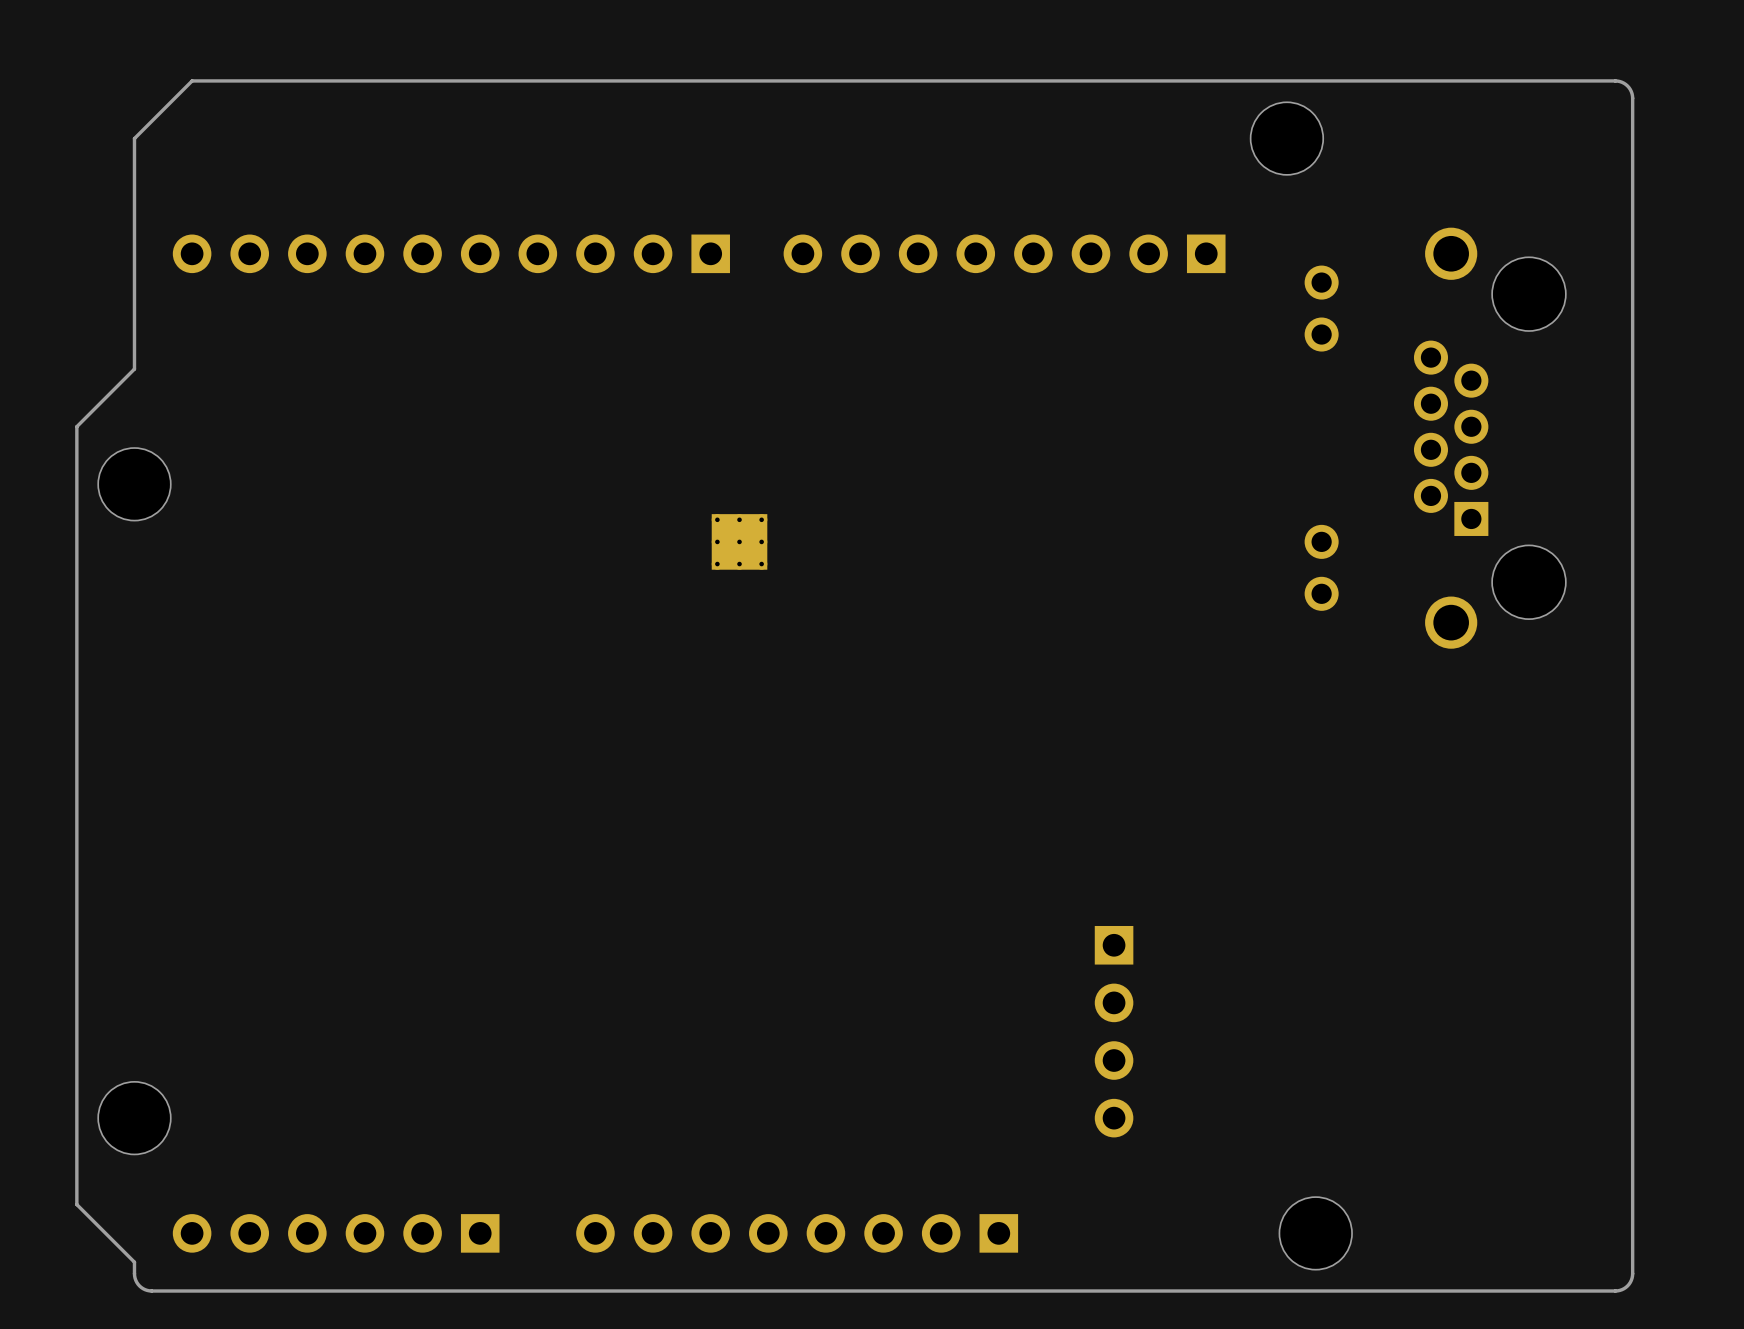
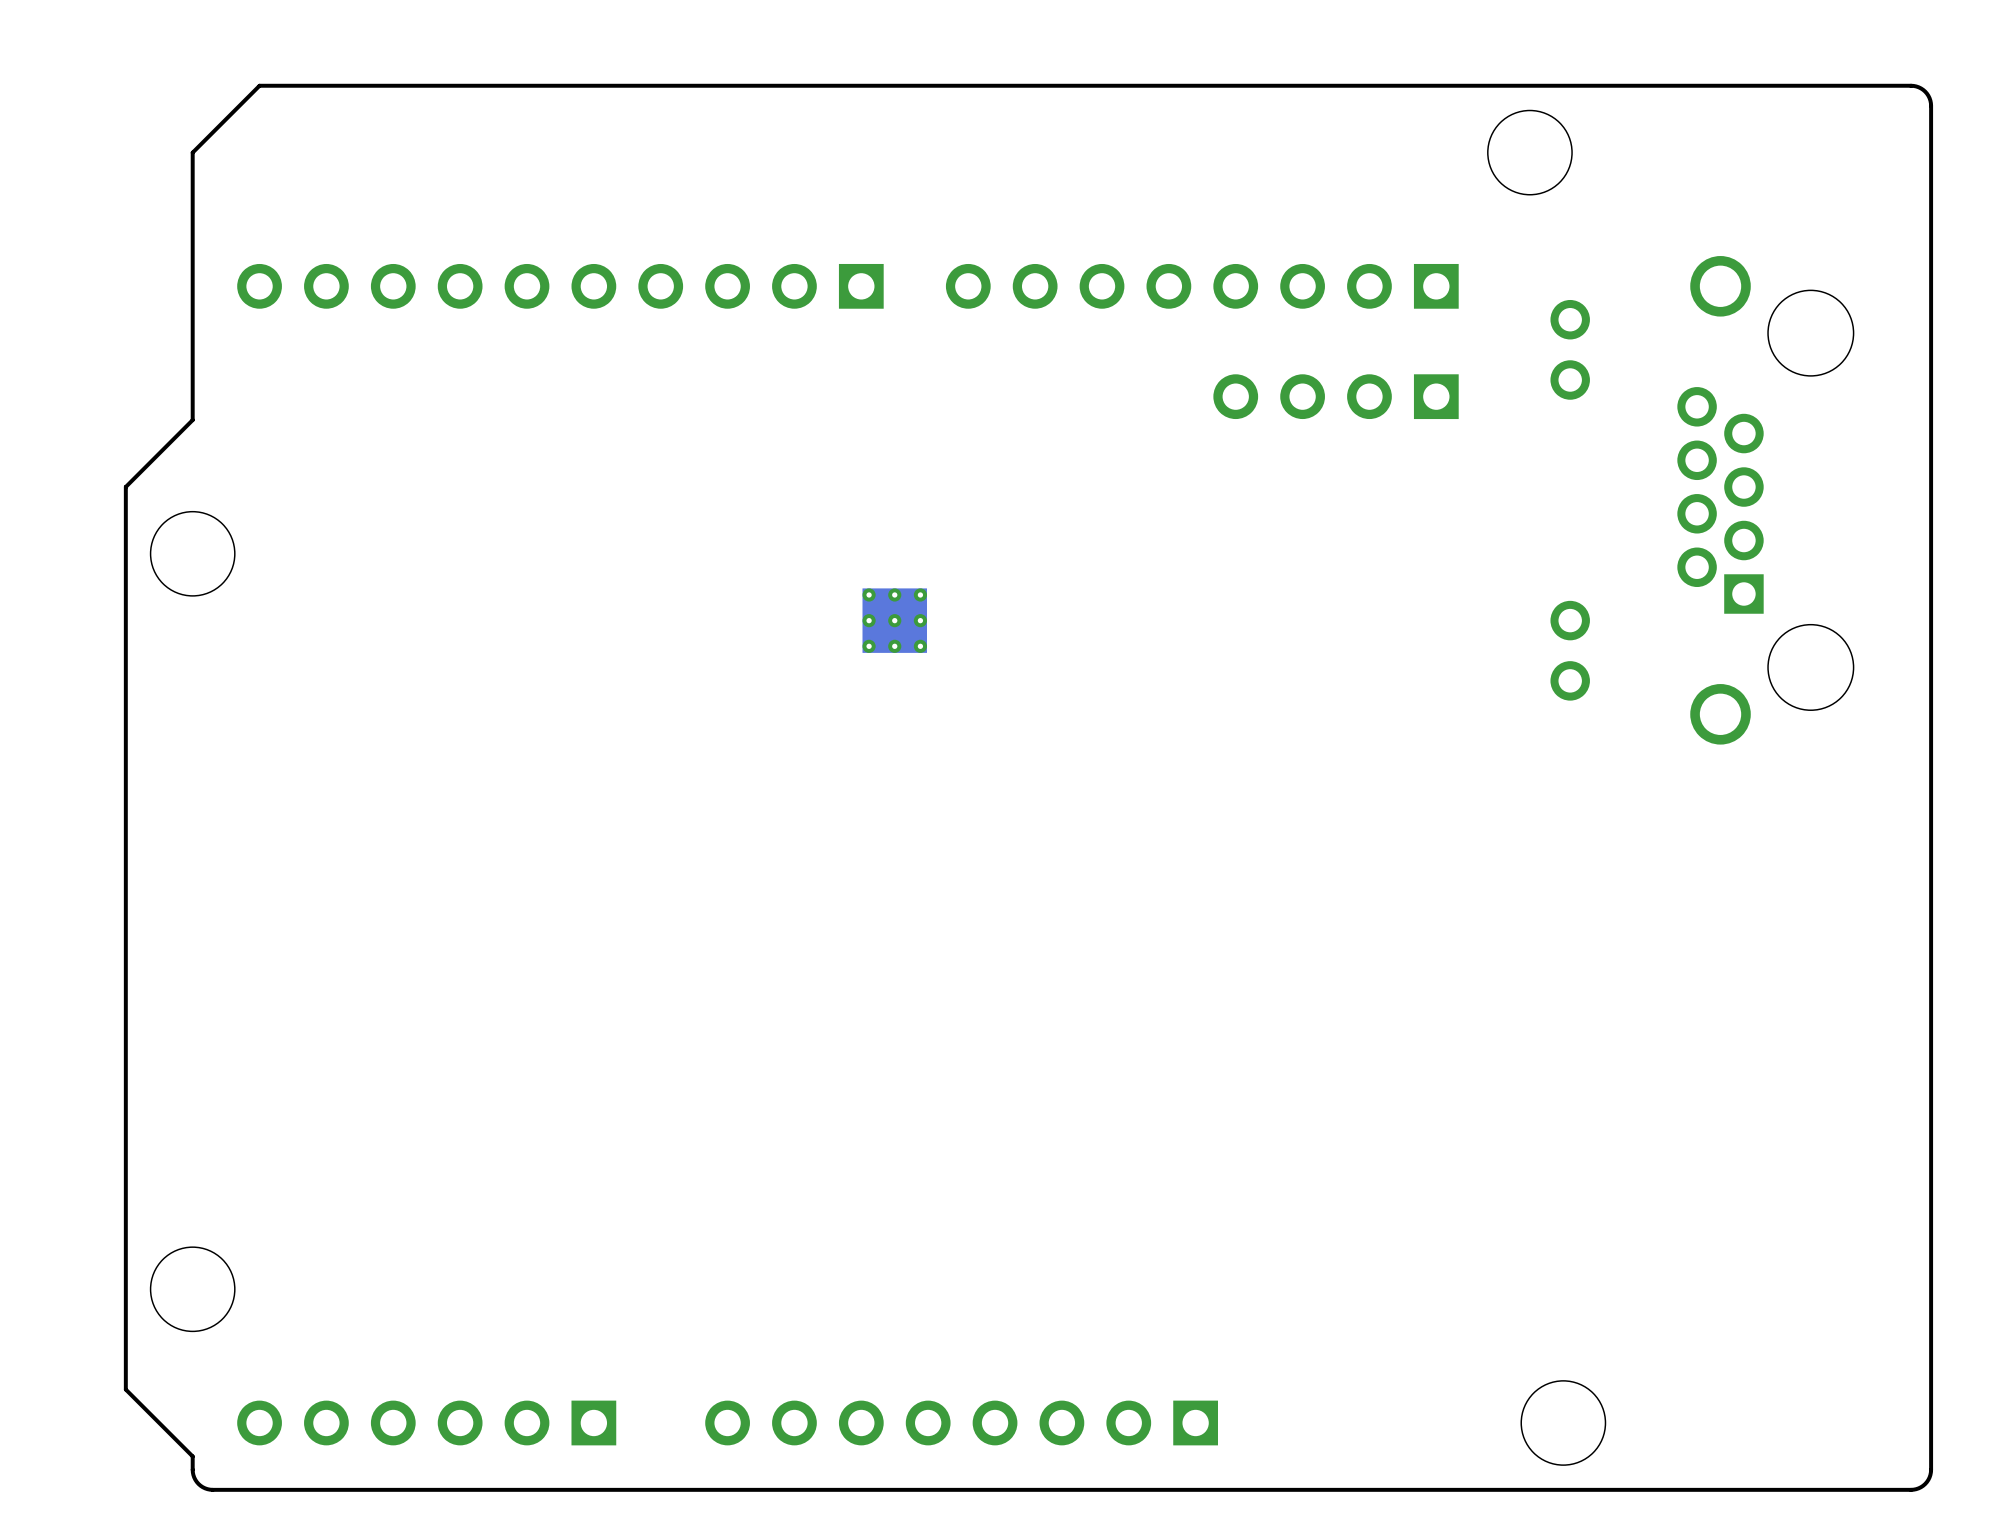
part: none -> (1336, 396)
part: (1114, 1031) -> none

